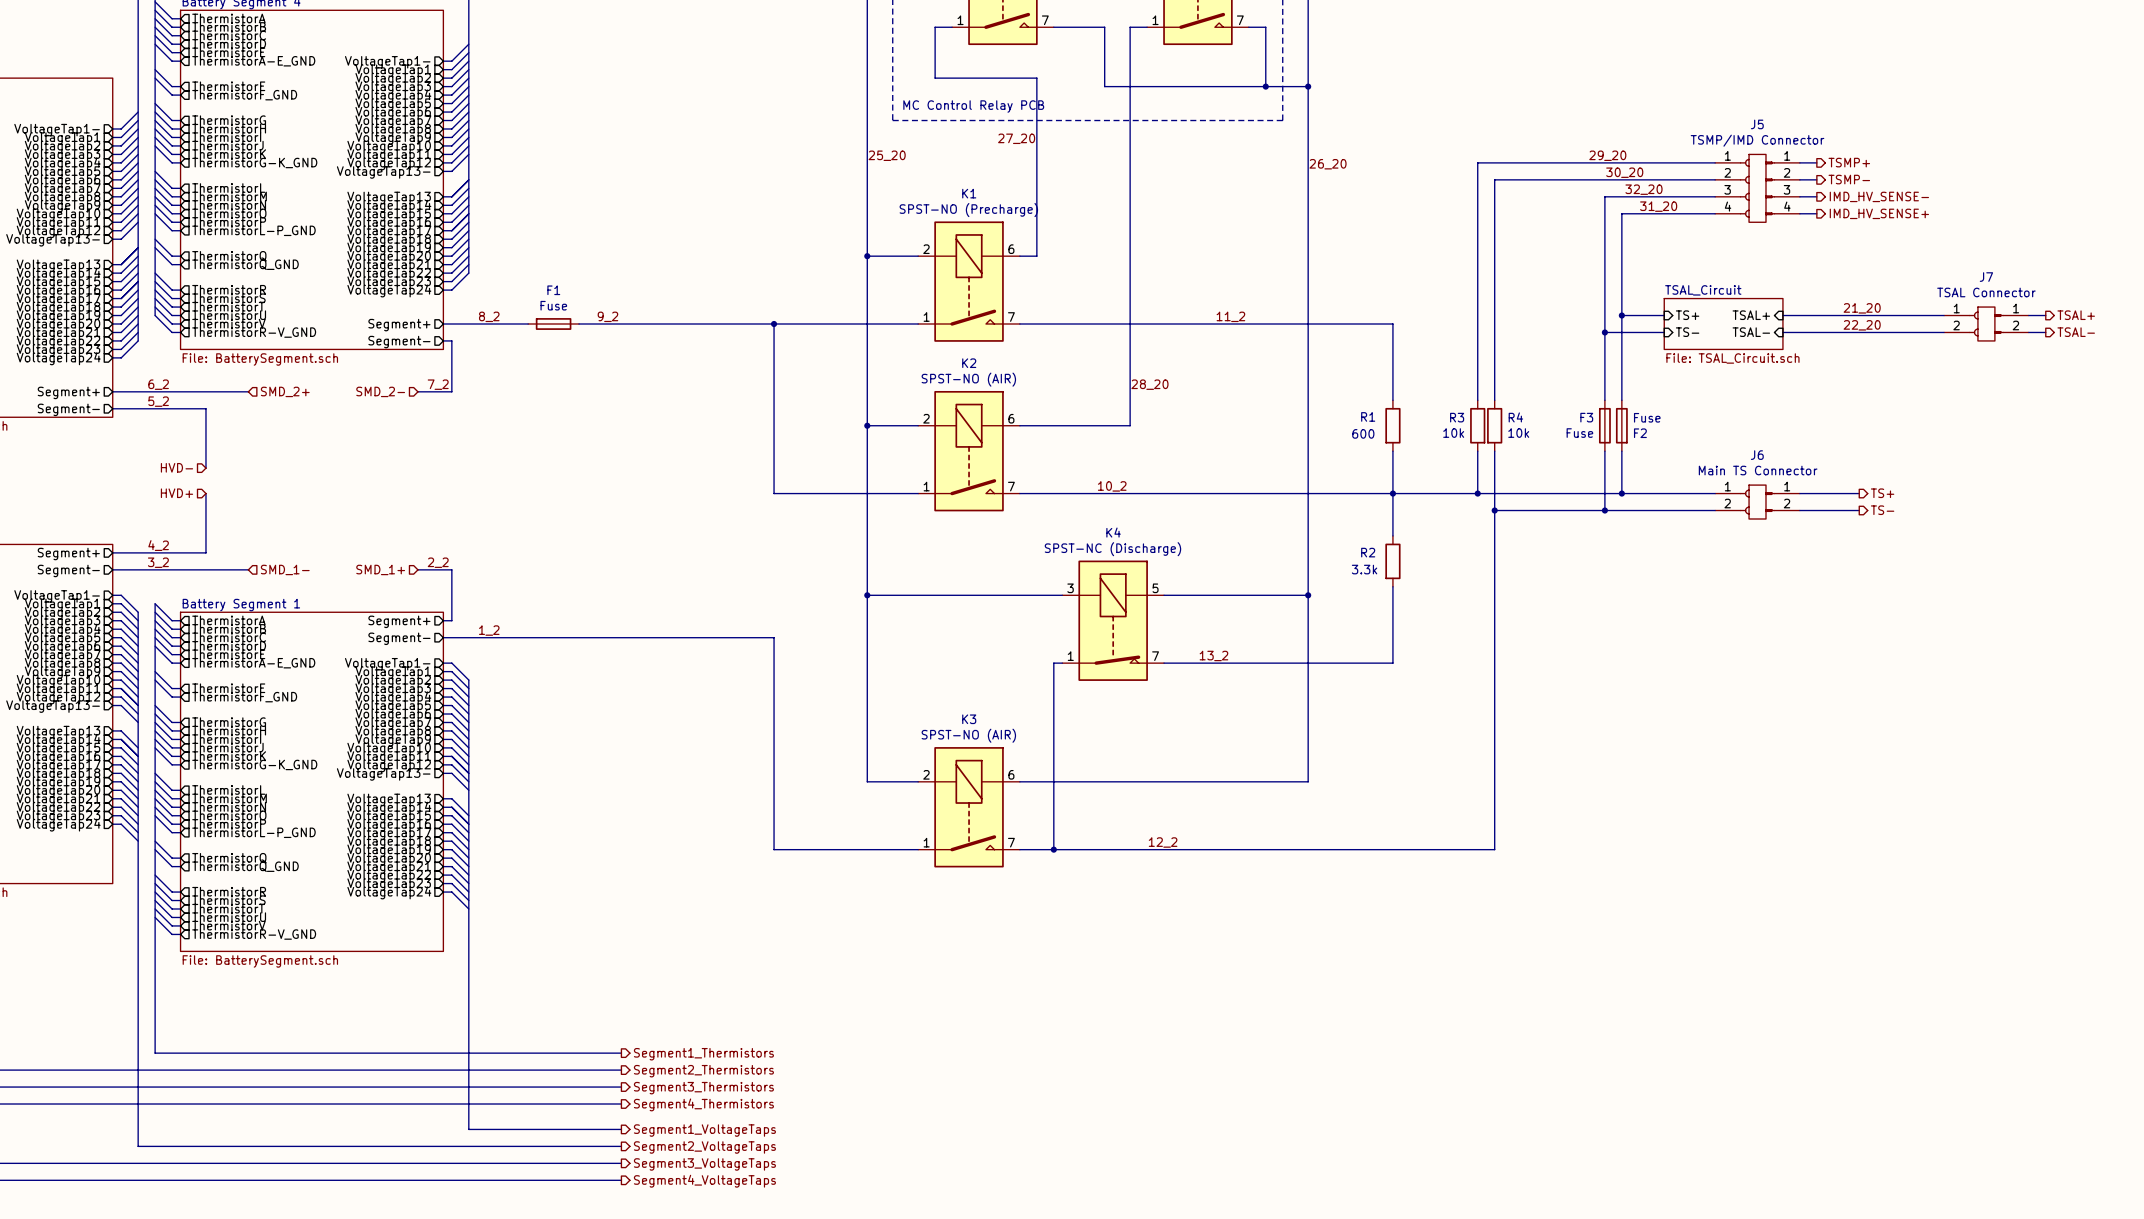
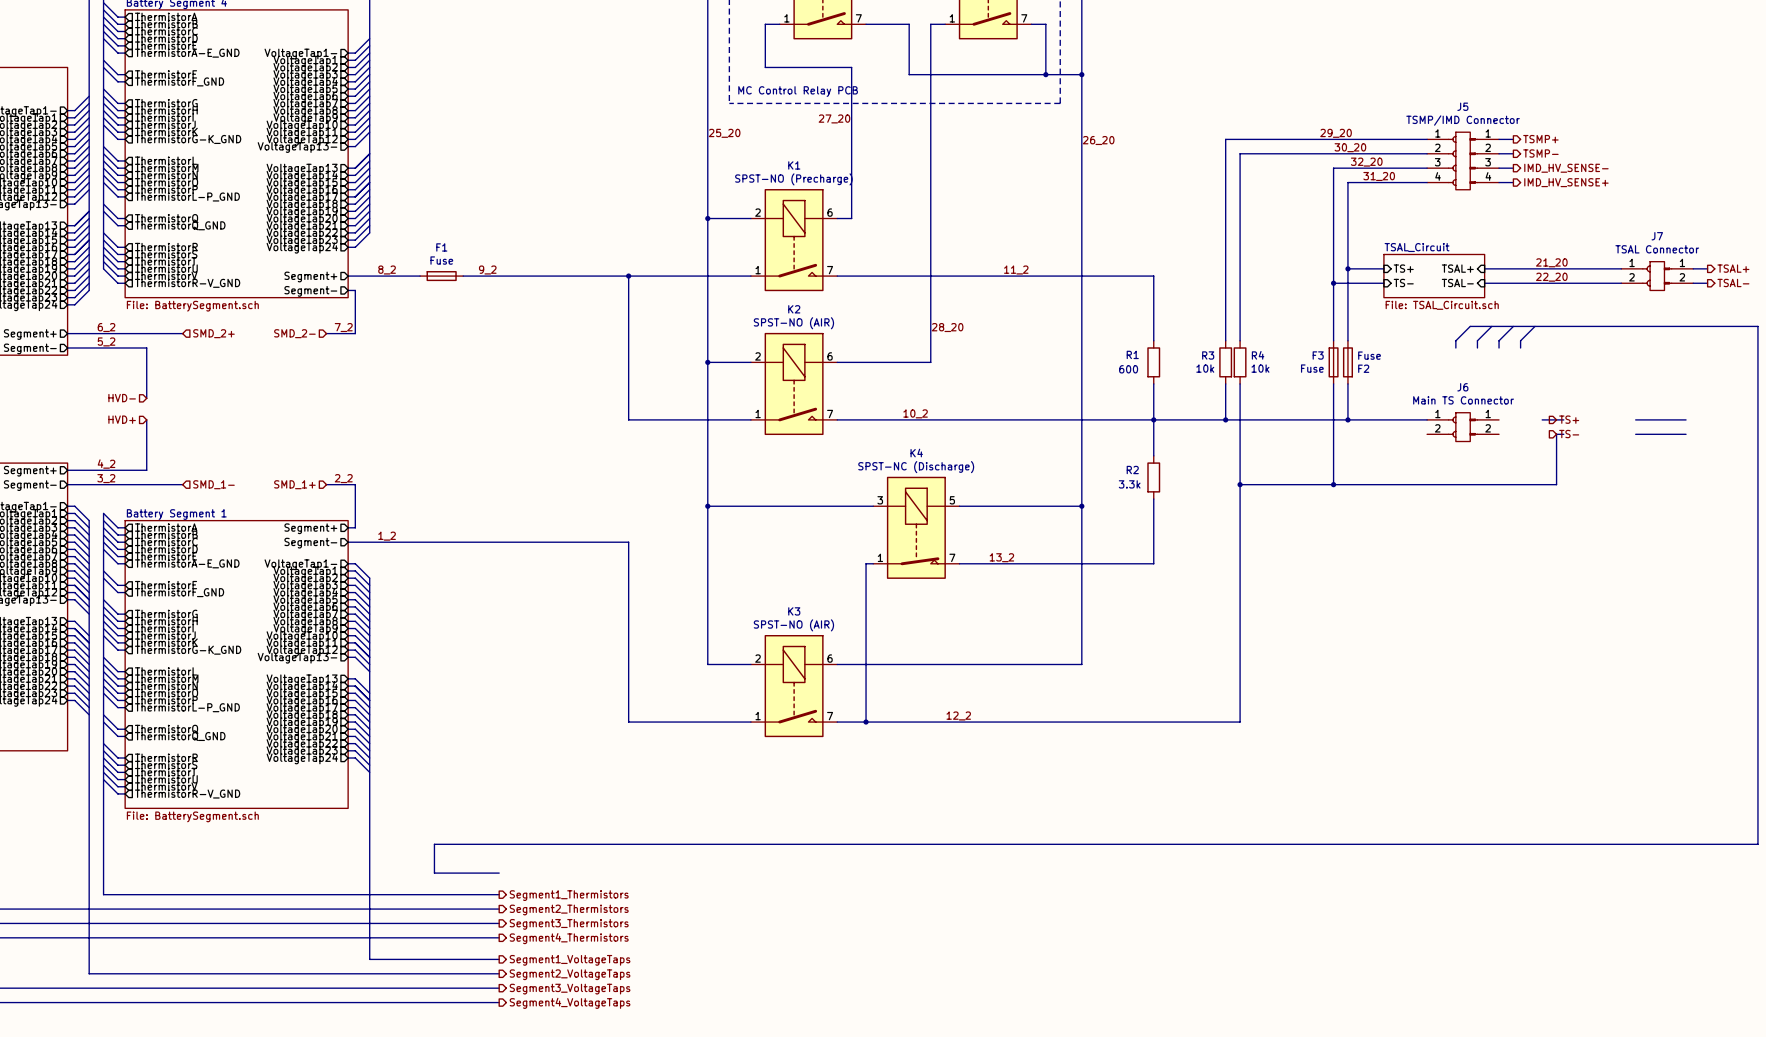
wire: none -> (1470, 326) (1455, 340) (1455, 347)
bus: none -> (1470, 326) (1757, 326) (1757, 844) (434, 844) (434, 873) (499, 873)
wire: none -> (1491, 326) (1477, 340) (1477, 347)
wire: none -> (1513, 326) (1499, 340) (1499, 347)
wire: none -> (1534, 326) (1520, 340) (1520, 347)
wire: (1799, 493) (1850, 493) -> none
wire: none -> (1549, 419) (1563, 419)
wire: none -> (1635, 419) (1686, 419)
wire: (1494, 510) (1715, 510) -> none
junction: (1494, 510) -> none
wire: none -> (1333, 434) (1333, 484)
junction: (1604, 510) -> none
wire: (1799, 510) (1859, 510) -> (1635, 434) (1686, 434)
wire: none -> (1563, 434) (1556, 434) (1556, 484) (1240, 484)
junction: none -> (1240, 484)
junction: none -> (1333, 484)

